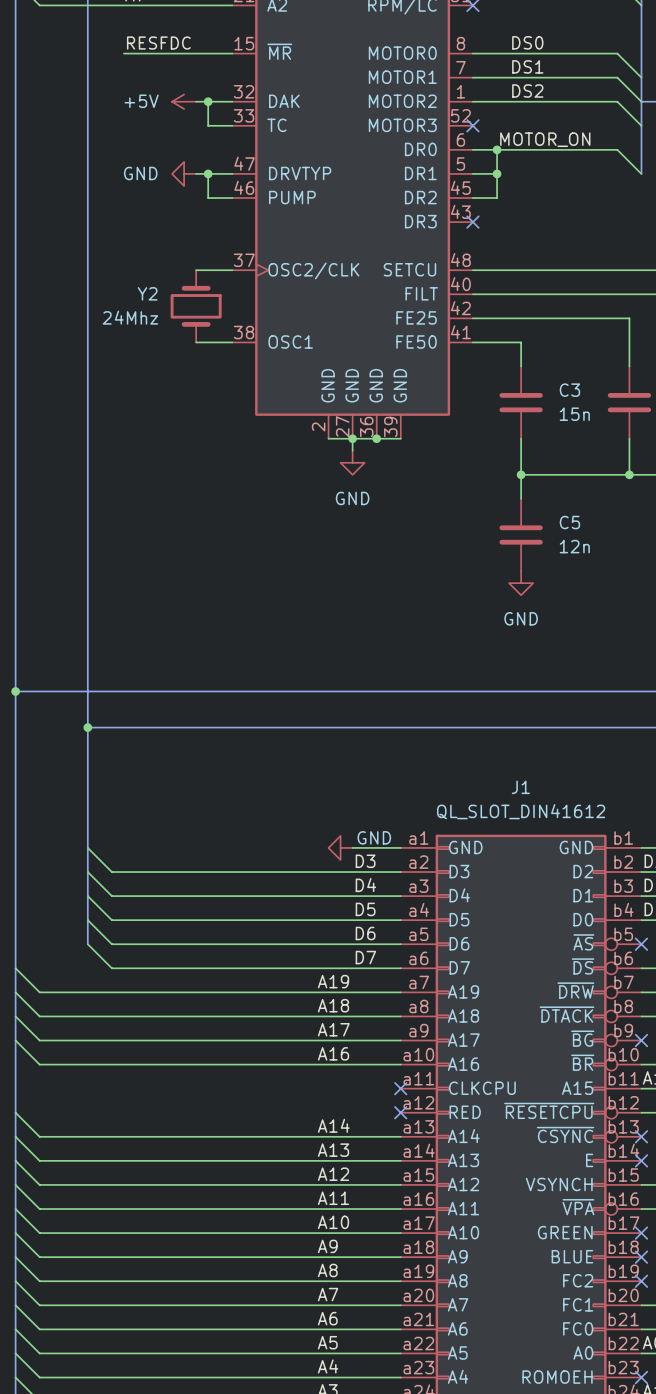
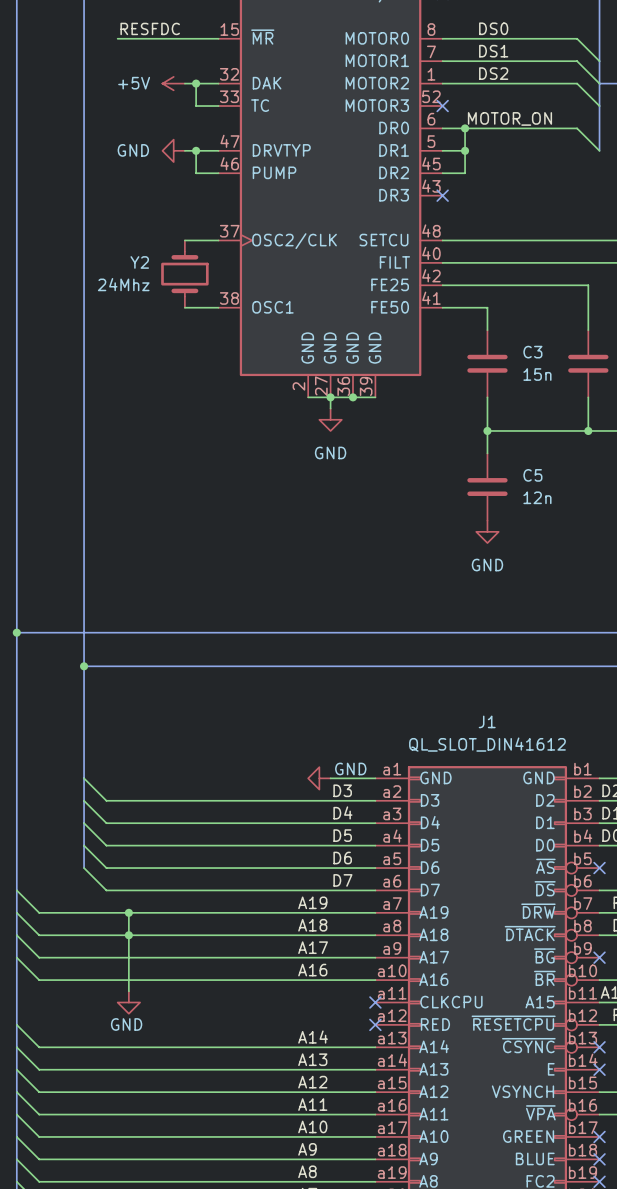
wire: none -> (128, 912) (128, 991)
junction: none -> (128, 912)
junction: none -> (128, 935)
power symbol: none -> GND (128, 1002)

